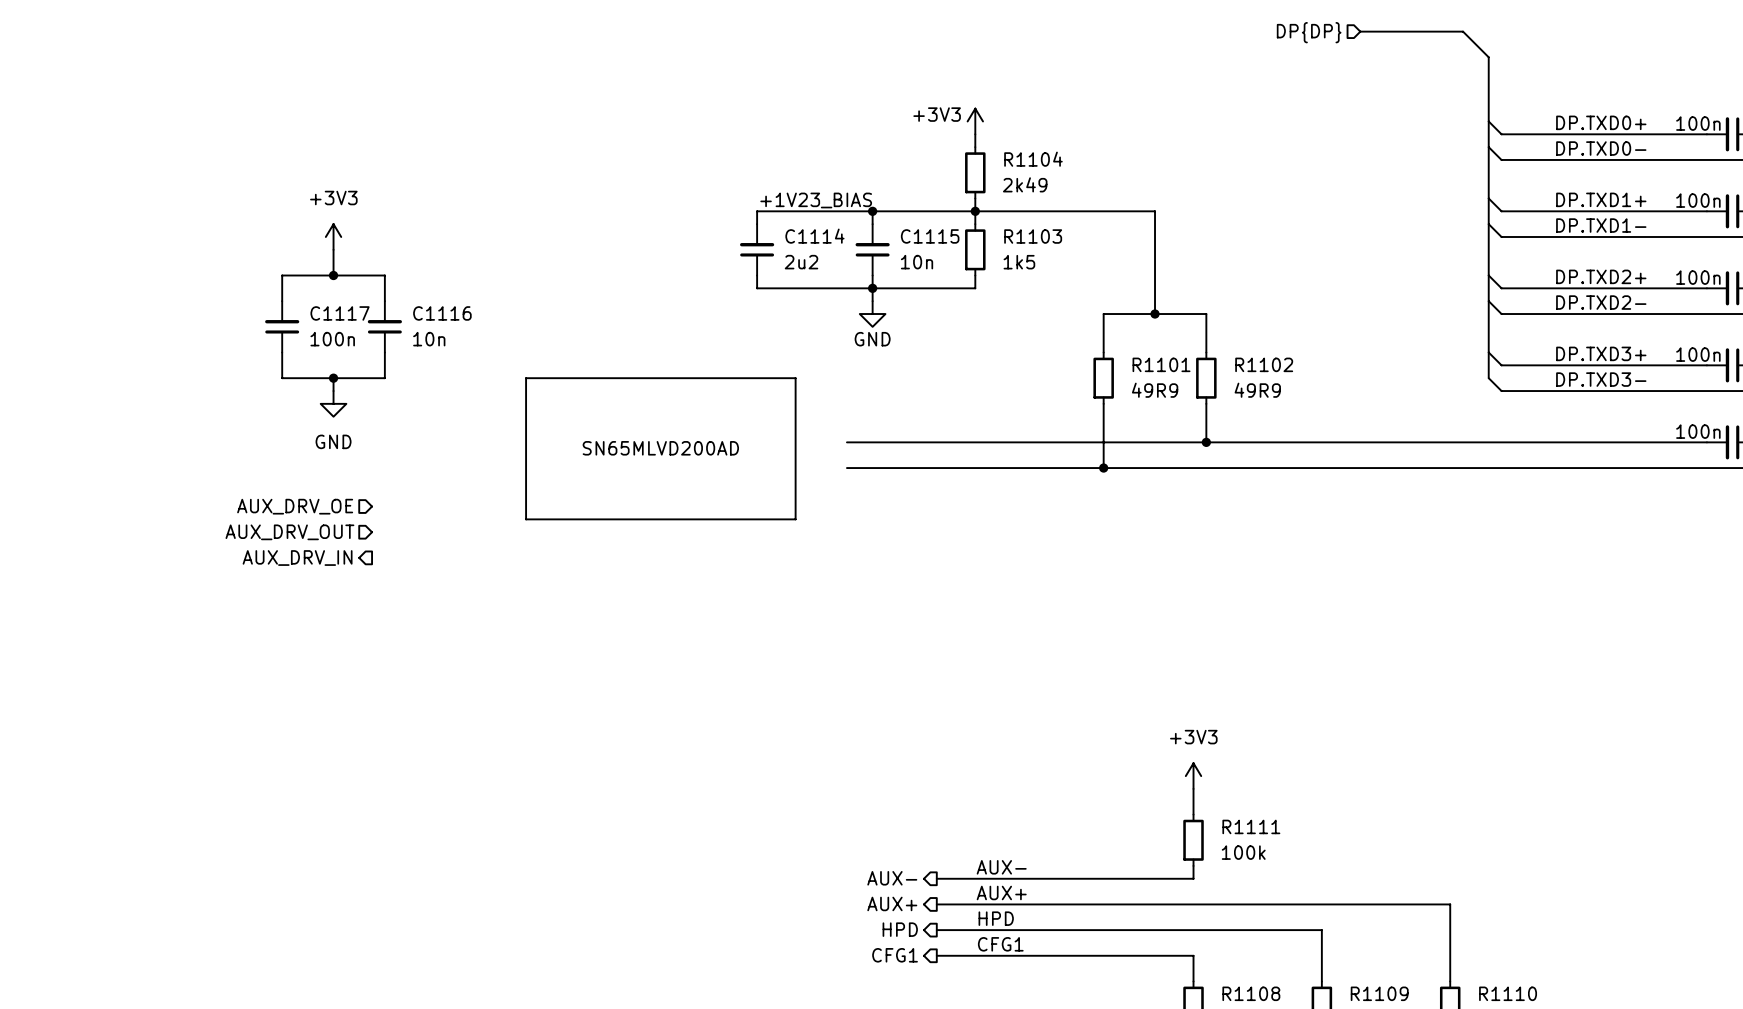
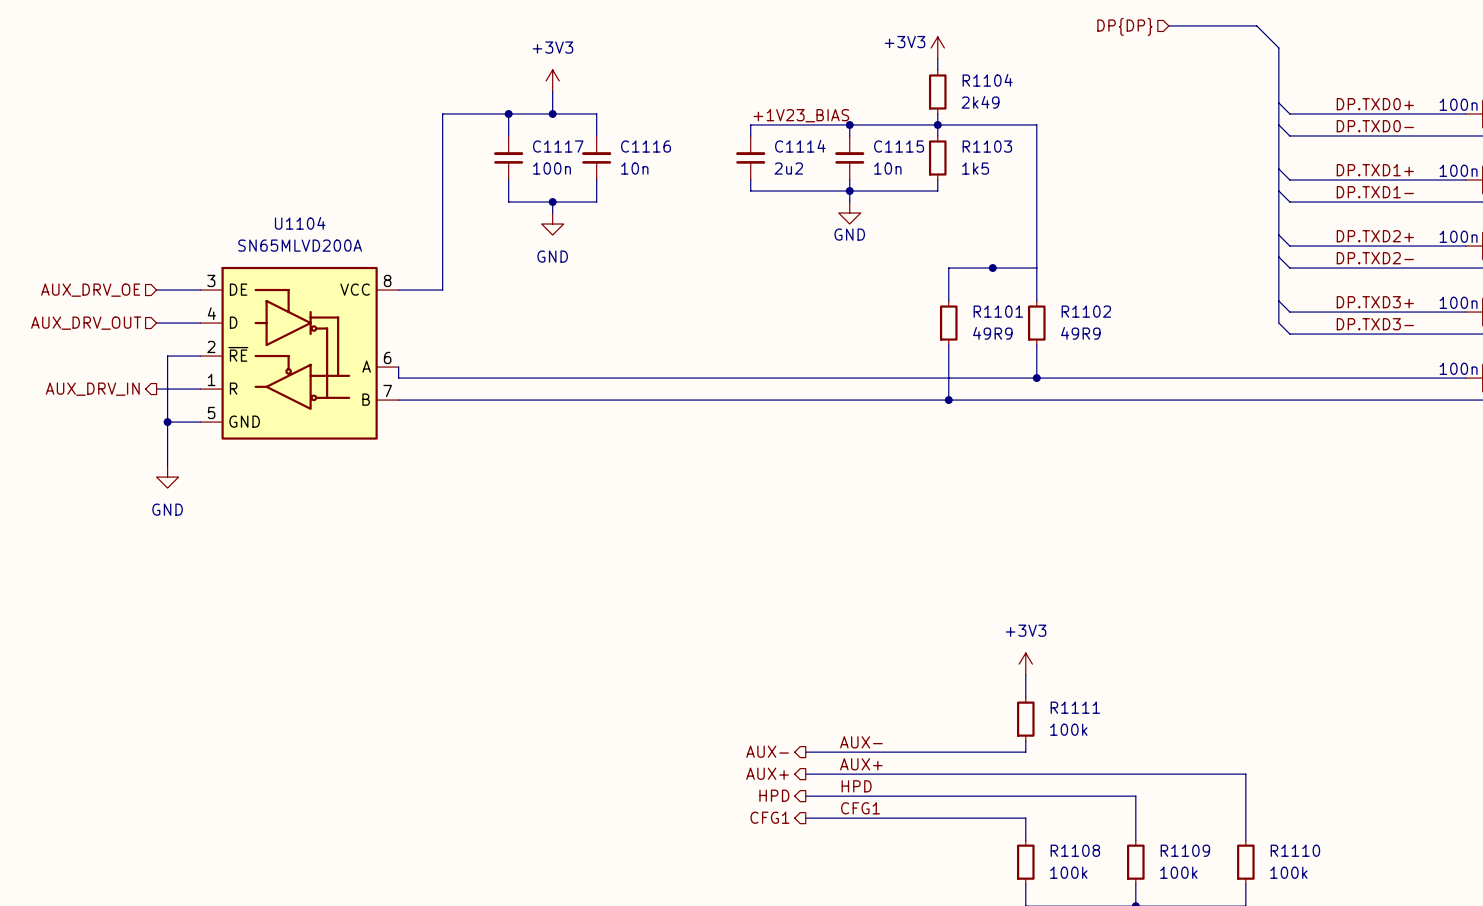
power symbol: none -> +3V3 (552, 80)
wire: none -> (552, 91) (552, 113)
power symbol position: +3V3 (975, 121) -> +3V3 (937, 47)
wire: none -> (508, 113) (508, 135)
junction: none -> (508, 113)
junction: none -> (552, 113)
wire: (975, 134) (975, 147) -> (937, 58) (937, 69)
wire: none -> (849, 124) (849, 135)
junction: none -> (849, 124)
junction: none -> (937, 124)
wire: none -> (596, 135) (596, 113) (442, 113) (442, 290) (398, 290)
wire: none -> (750, 135) (750, 124) (1036, 124) (1036, 268)
R1104 position: (975, 172) -> (937, 91)
wire: (975, 198) (975, 224) -> (937, 113) (937, 135)
label position: +1V23_BIAS (816, 200) -> +1V23_BIAS (801, 115)
wire: none -> (508, 180) (508, 202) (596, 202) (596, 180)
junction: (872, 211) -> none
junction position: (975, 211) -> (849, 191)
wire: none -> (937, 180) (937, 191) (750, 191)
wire: (757, 224) (757, 211) (1155, 211) (1155, 314) -> none
power symbol: +3V3 (333, 236) -> none
wire: none -> (552, 202) (552, 213)
junction: none -> (552, 202)
wire: (333, 249) (333, 275) -> none
C1114 position: (757, 249) -> (750, 157)
C1115 position: (872, 249) -> (849, 157)
R1103 position: (975, 249) -> (937, 157)
power symbol: none -> GND (849, 213)
power symbol: none -> GND (552, 224)
junction: (333, 275) -> none
wire: (757, 275) (757, 288) (975, 288) (975, 275) -> none
wire: (872, 275) (872, 301) -> (849, 180) (849, 202)
junction: (872, 288) -> none
wire: (282, 301) (282, 275) (384, 275) (384, 301) -> none
power symbol: GND (872, 314) -> none
C1117 position: (282, 326) -> (508, 157)
C1116 position: (384, 326) -> (596, 157)
hierarchical label: none -> AUX_DRV_OE (90, 290)
wire: none -> (156, 290) (200, 290)
wire: none -> (156, 323) (200, 323)
junction: (333, 378) -> none
line: (526, 378) (795, 378) (795, 519) (526, 519) (526, 378) -> none
power symbol: GND (333, 403) -> none
U1104: none -> (299, 353)
wire: none -> (200, 356) (167, 356) (167, 466)
wire: none -> (398, 367) (398, 378) (728, 378)
text: SN65MLVD200AD (660, 448) -> none
wire: none -> (156, 389) (200, 389)
wire: none -> (398, 400) (728, 400)
wire: none -> (167, 422) (200, 422)
junction: none -> (167, 422)
hierarchical label: AUX_DRV_OE (295, 506) -> none
hierarchical label position: AUX_DRV_OUT (289, 532) -> AUX_DRV_OUT (86, 323)
power symbol: none -> GND (167, 477)
hierarchical label position: AUX_DRV_IN (297, 558) -> AUX_DRV_IN (92, 389)

